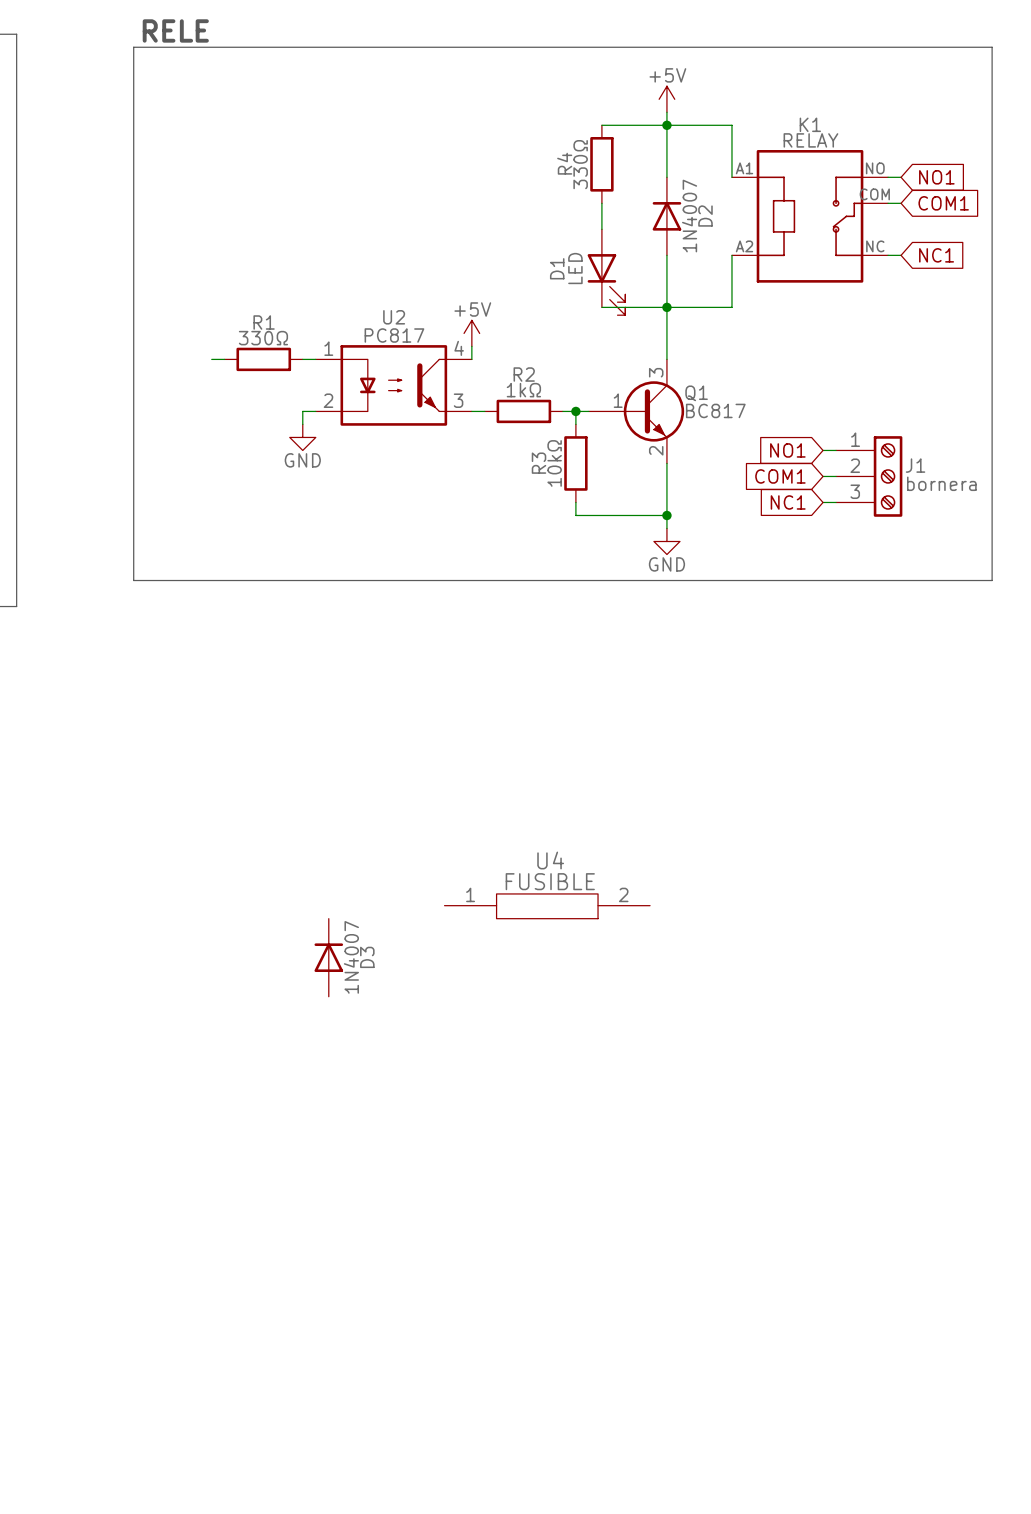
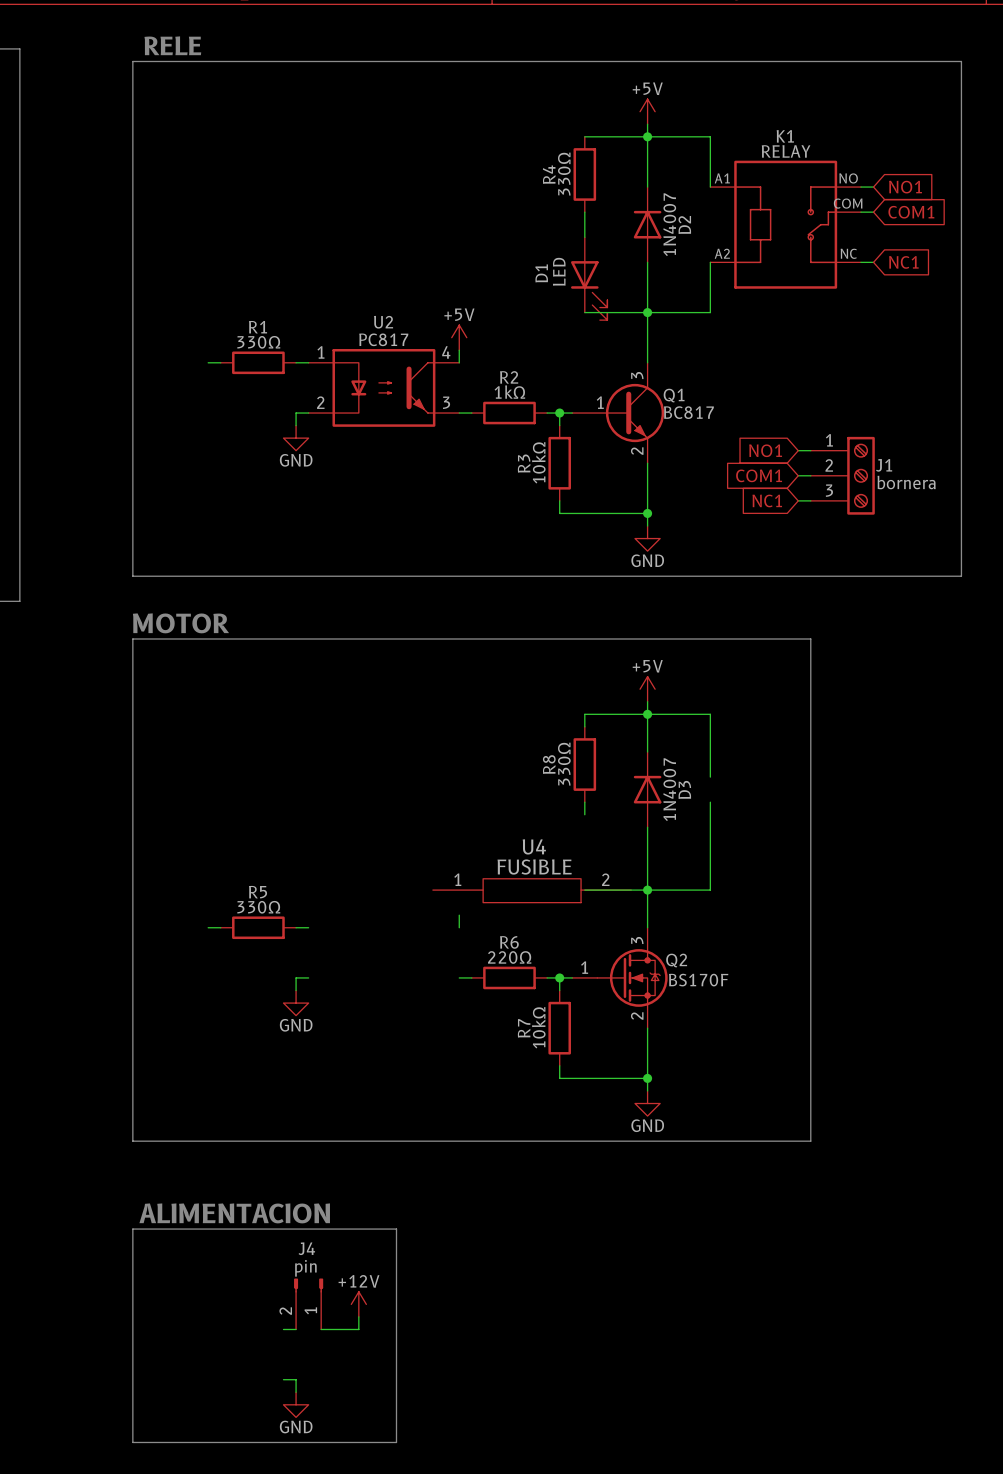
text: none -> MOTOR (180, 623)
bus: none -> (132, 638) (132, 1141) (810, 1141) (810, 638) (132, 638)
power symbol: none -> +5V (647, 689)
wire: none -> (647, 701) (647, 751)
junction: none -> (647, 714)
wire: none -> (584, 726) (584, 714) (710, 714) (710, 777)
R8: none -> 330Ω (584, 764)
wire: none -> (584, 802) (584, 814)
wire: none -> (710, 802) (710, 890) (584, 890)
wire: none -> (647, 827) (647, 927)
junction: none -> (647, 890)
wire: none -> (459, 915) (459, 927)
wire: none -> (208, 927) (220, 927)
R5: none -> 330Ω (258, 927)
wire: none -> (296, 927) (308, 927)
D3 position: (328, 957) -> (647, 789)
wire: none -> (308, 977) (296, 977) (296, 990)
wire: none -> (459, 977) (471, 977)
R6: none -> 220Ω (509, 977)
wire: none -> (547, 977) (572, 977)
wire: none -> (559, 977) (559, 990)
junction: none -> (559, 977)
Q2: none -> BS170F (619, 977)
power symbol: none -> GND (296, 1003)
R7: none -> 10kΩ (559, 1028)
wire: none -> (647, 1028) (647, 1090)
wire: none -> (559, 1065) (559, 1078) (647, 1078)
junction: none -> (647, 1078)
power symbol: none -> GND (647, 1103)
text: none -> ALIMENTACION (234, 1213)
bus: none -> (132, 1229) (396, 1229) (396, 1442) (132, 1442) (132, 1229)
J4: none -> pin (308, 1304)
power symbol: none -> +12V (358, 1304)
wire: none -> (358, 1316) (358, 1329) (321, 1329)
wire: none -> (283, 1329) (296, 1329)
wire: none -> (283, 1379) (296, 1379) (296, 1392)
power symbol: none -> GND (296, 1404)

